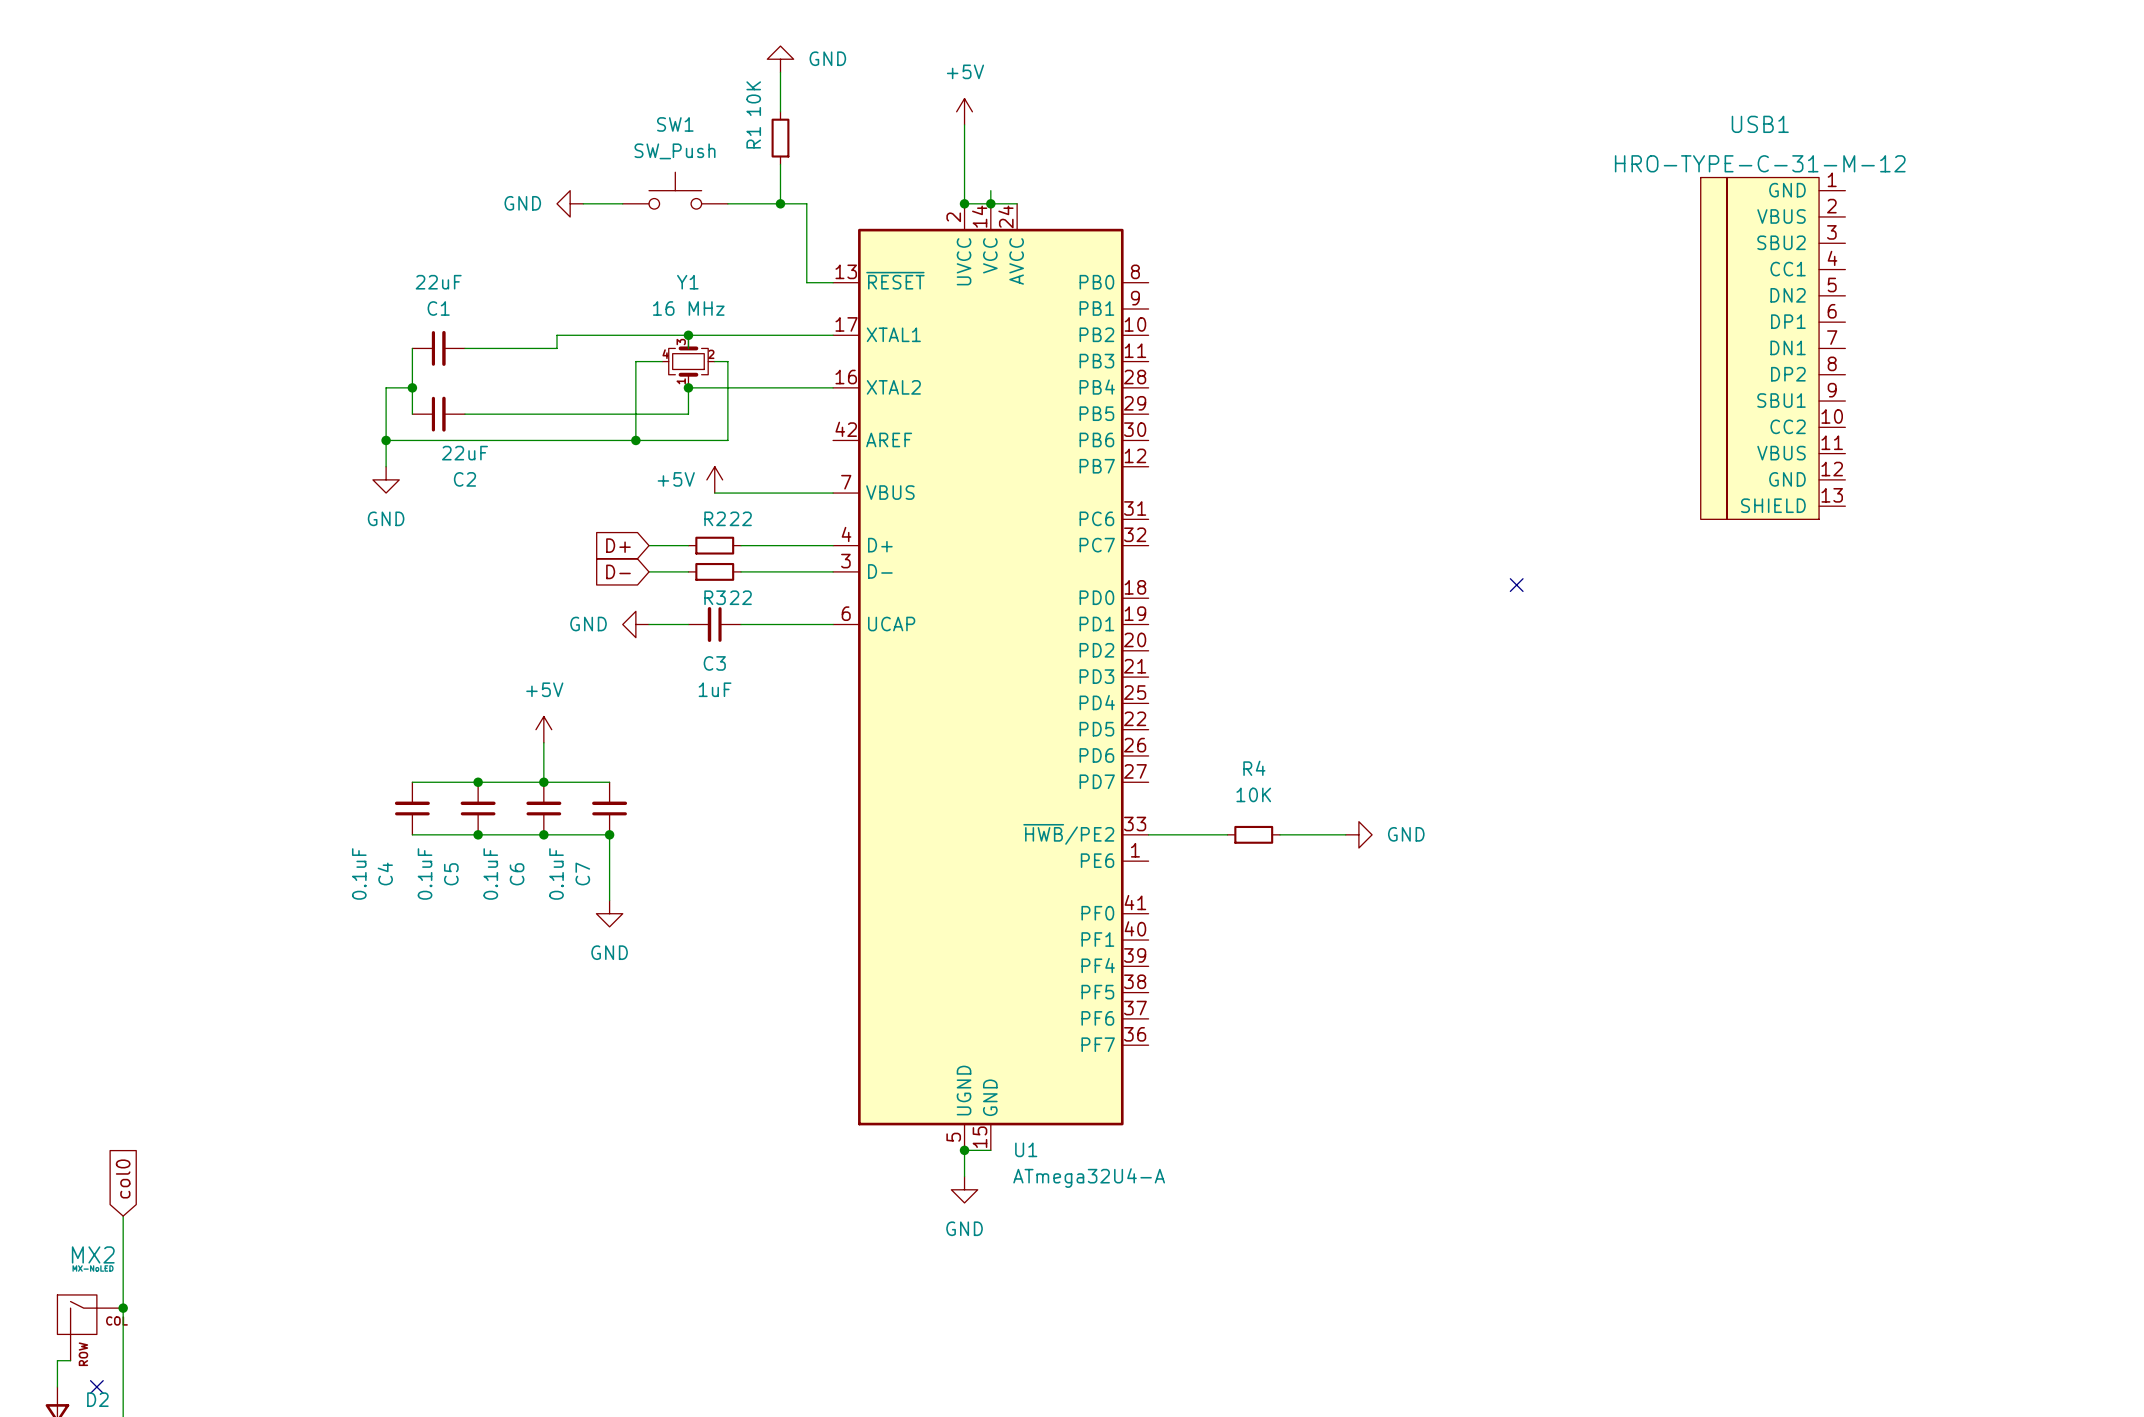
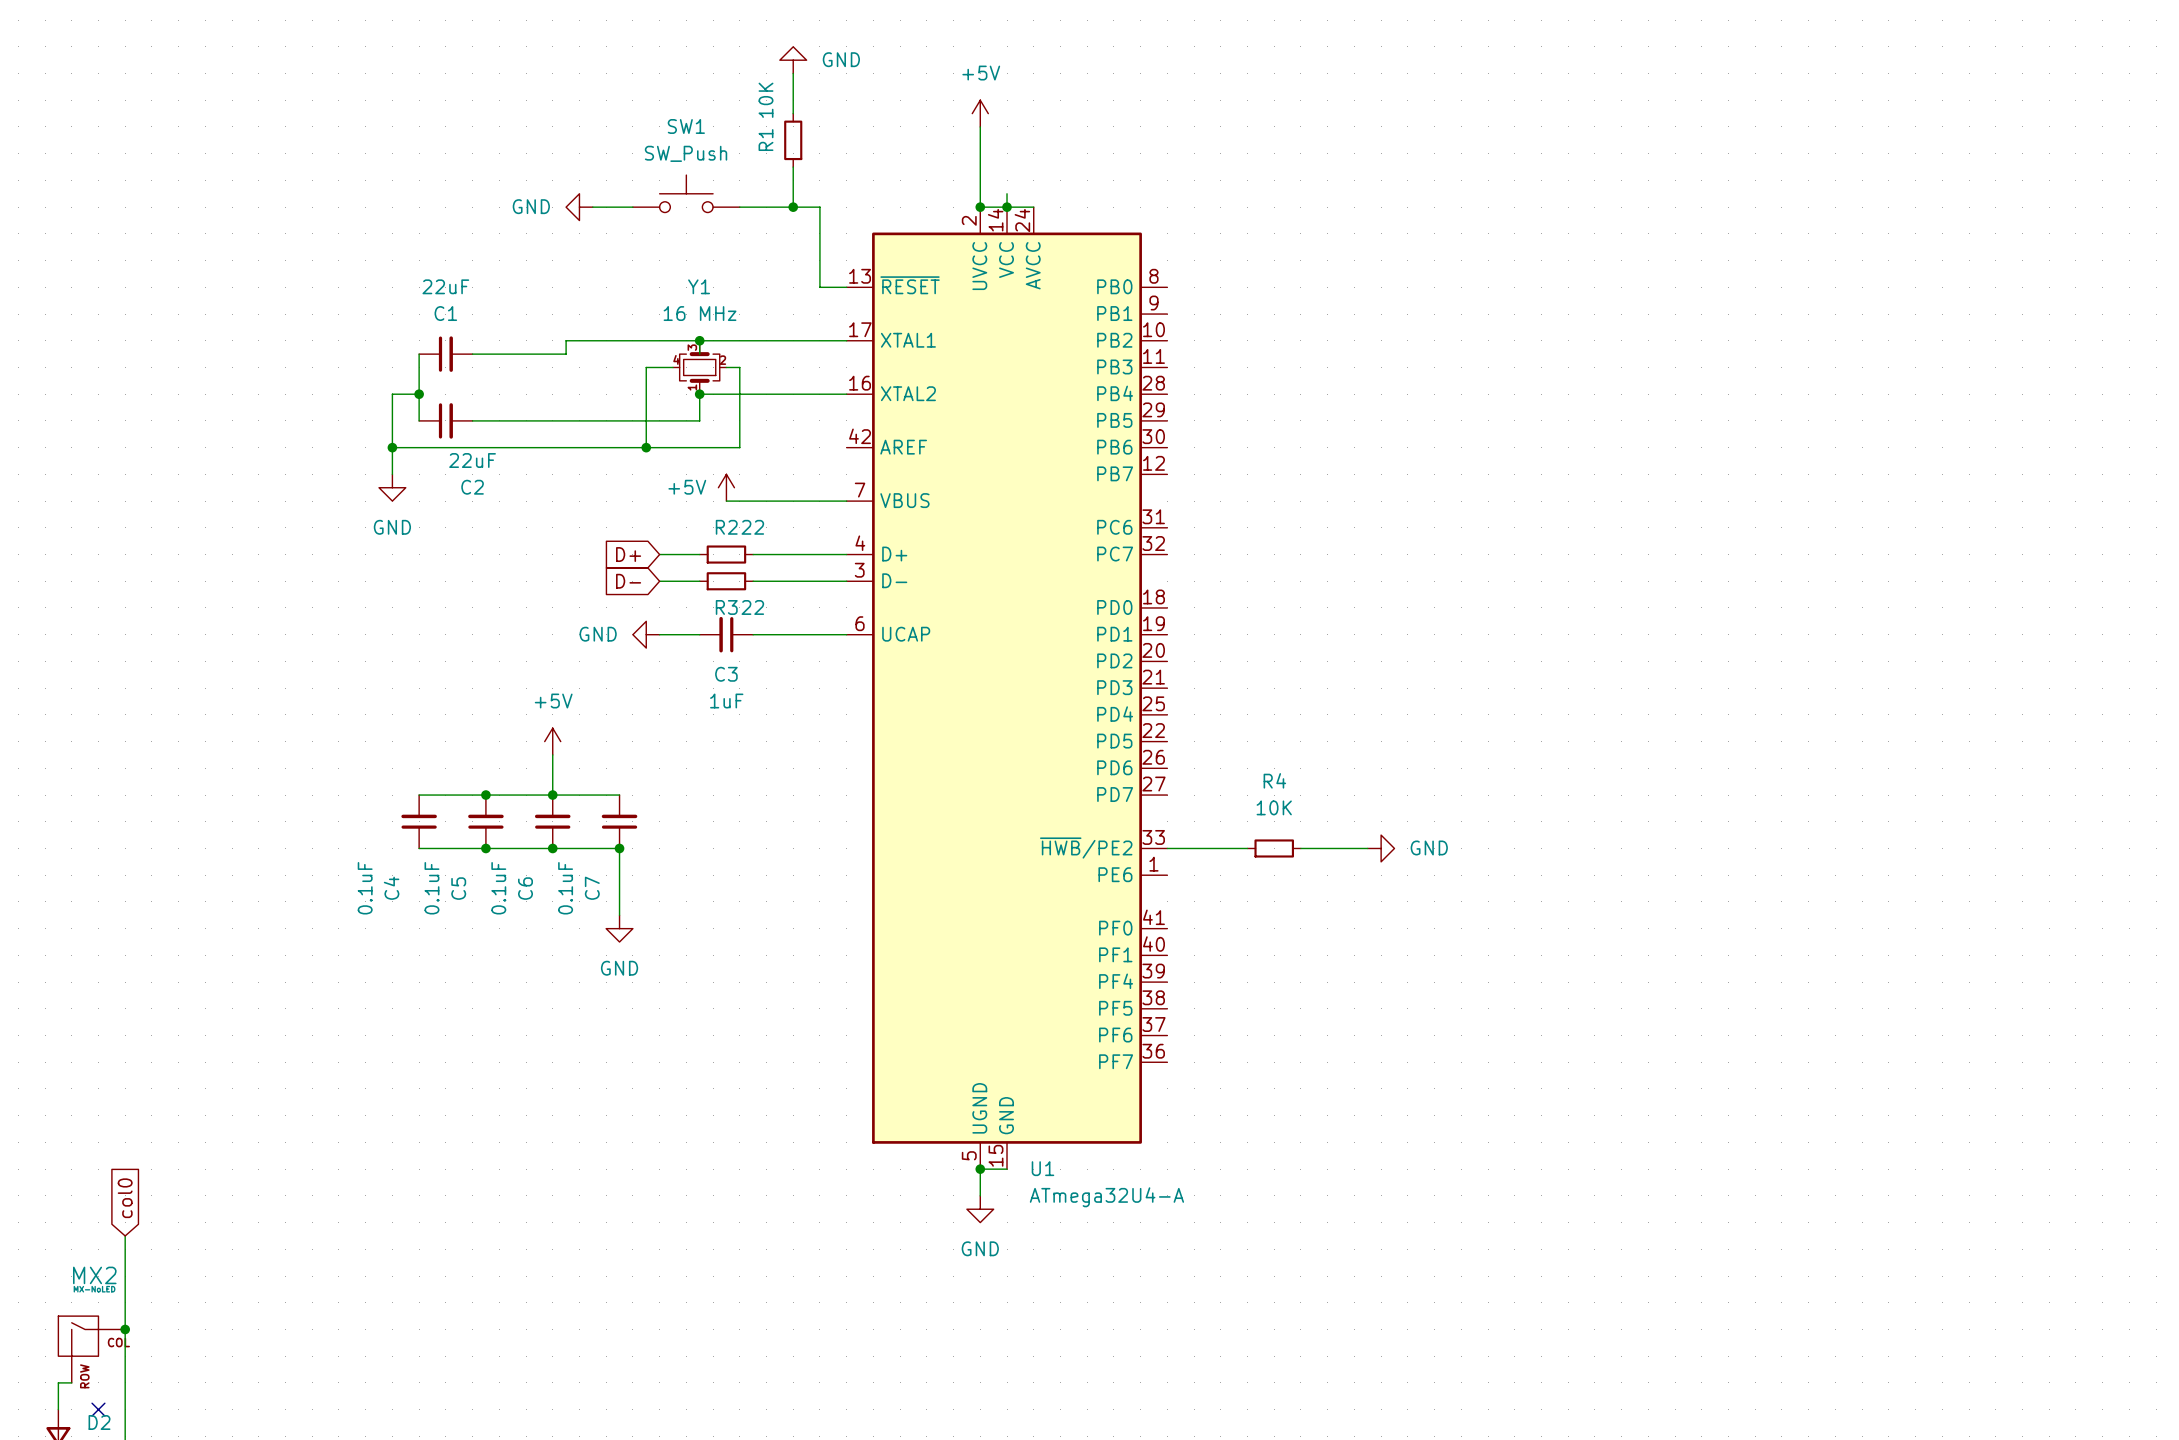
USB1: HRO-TYPE-C-31-M-12 (1773, 348) -> none
no-connect mark: (1516, 585) -> none

